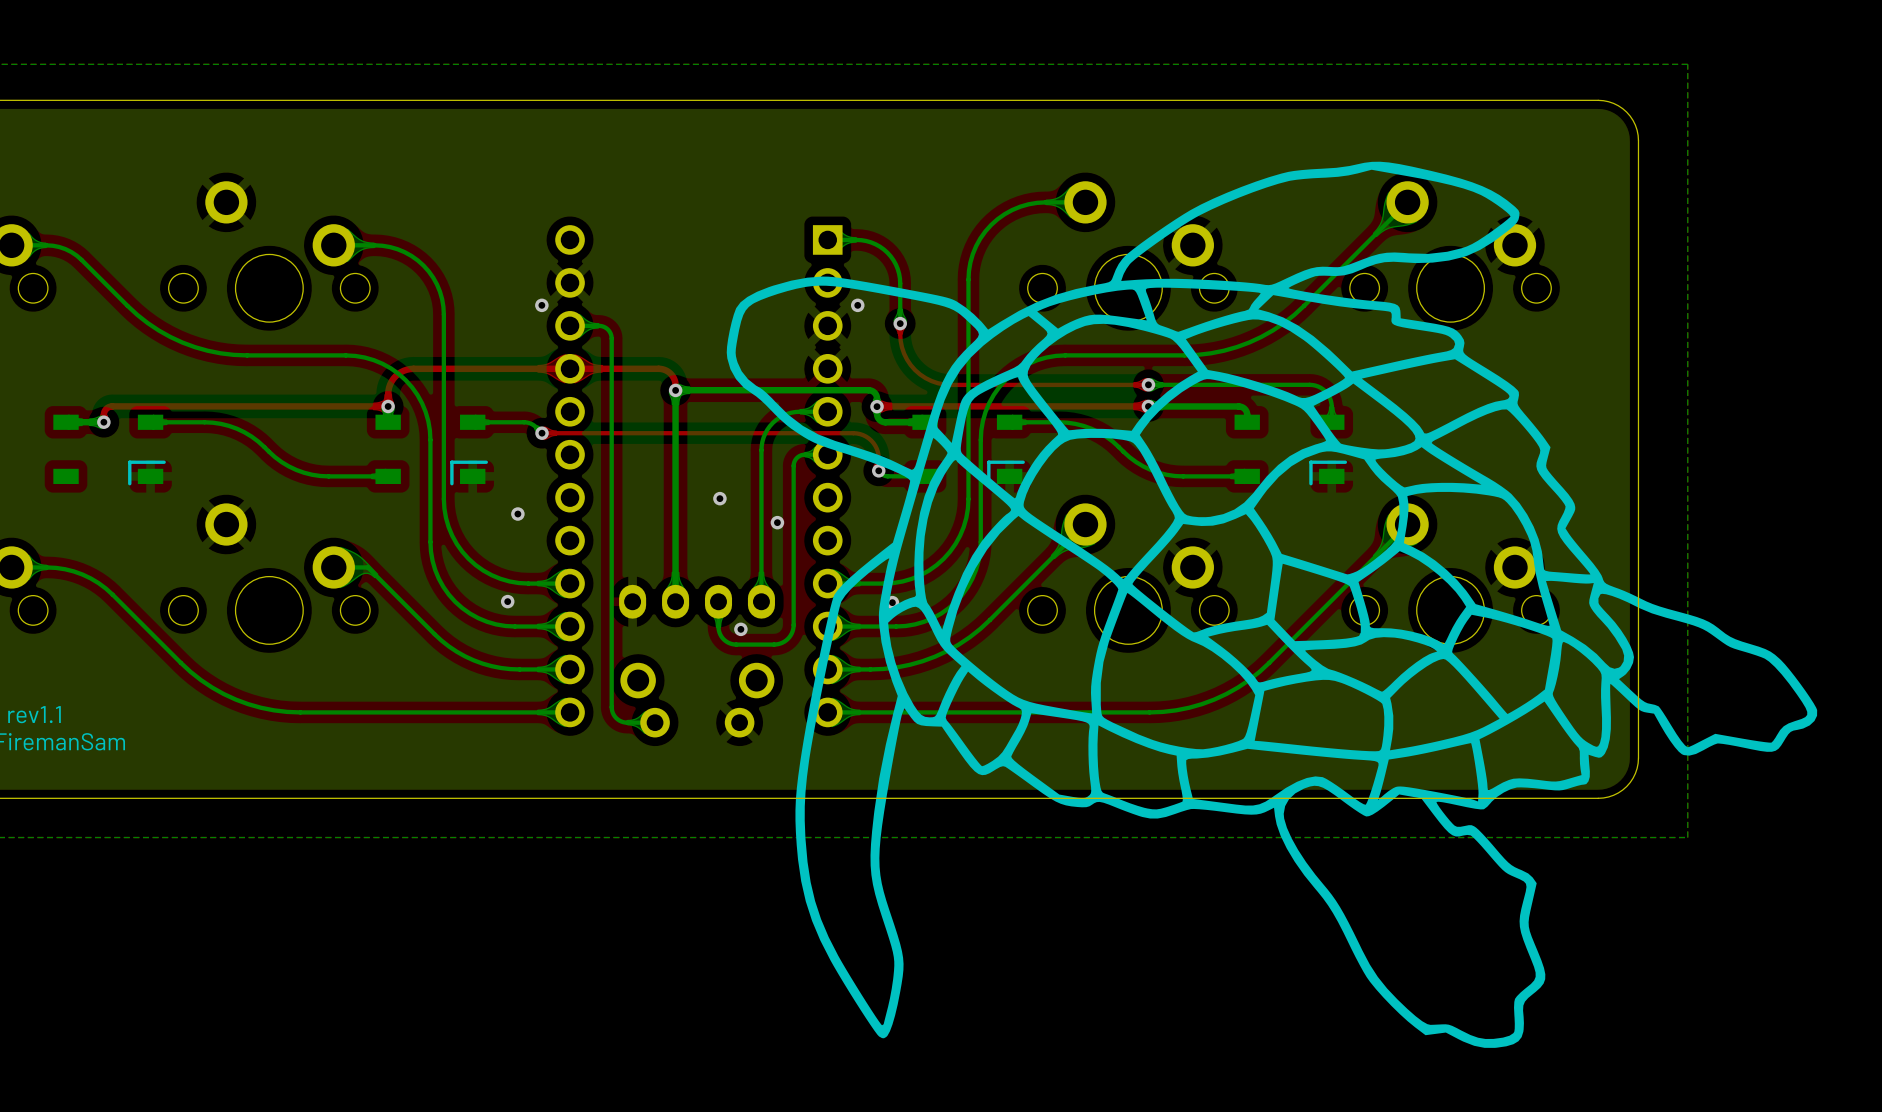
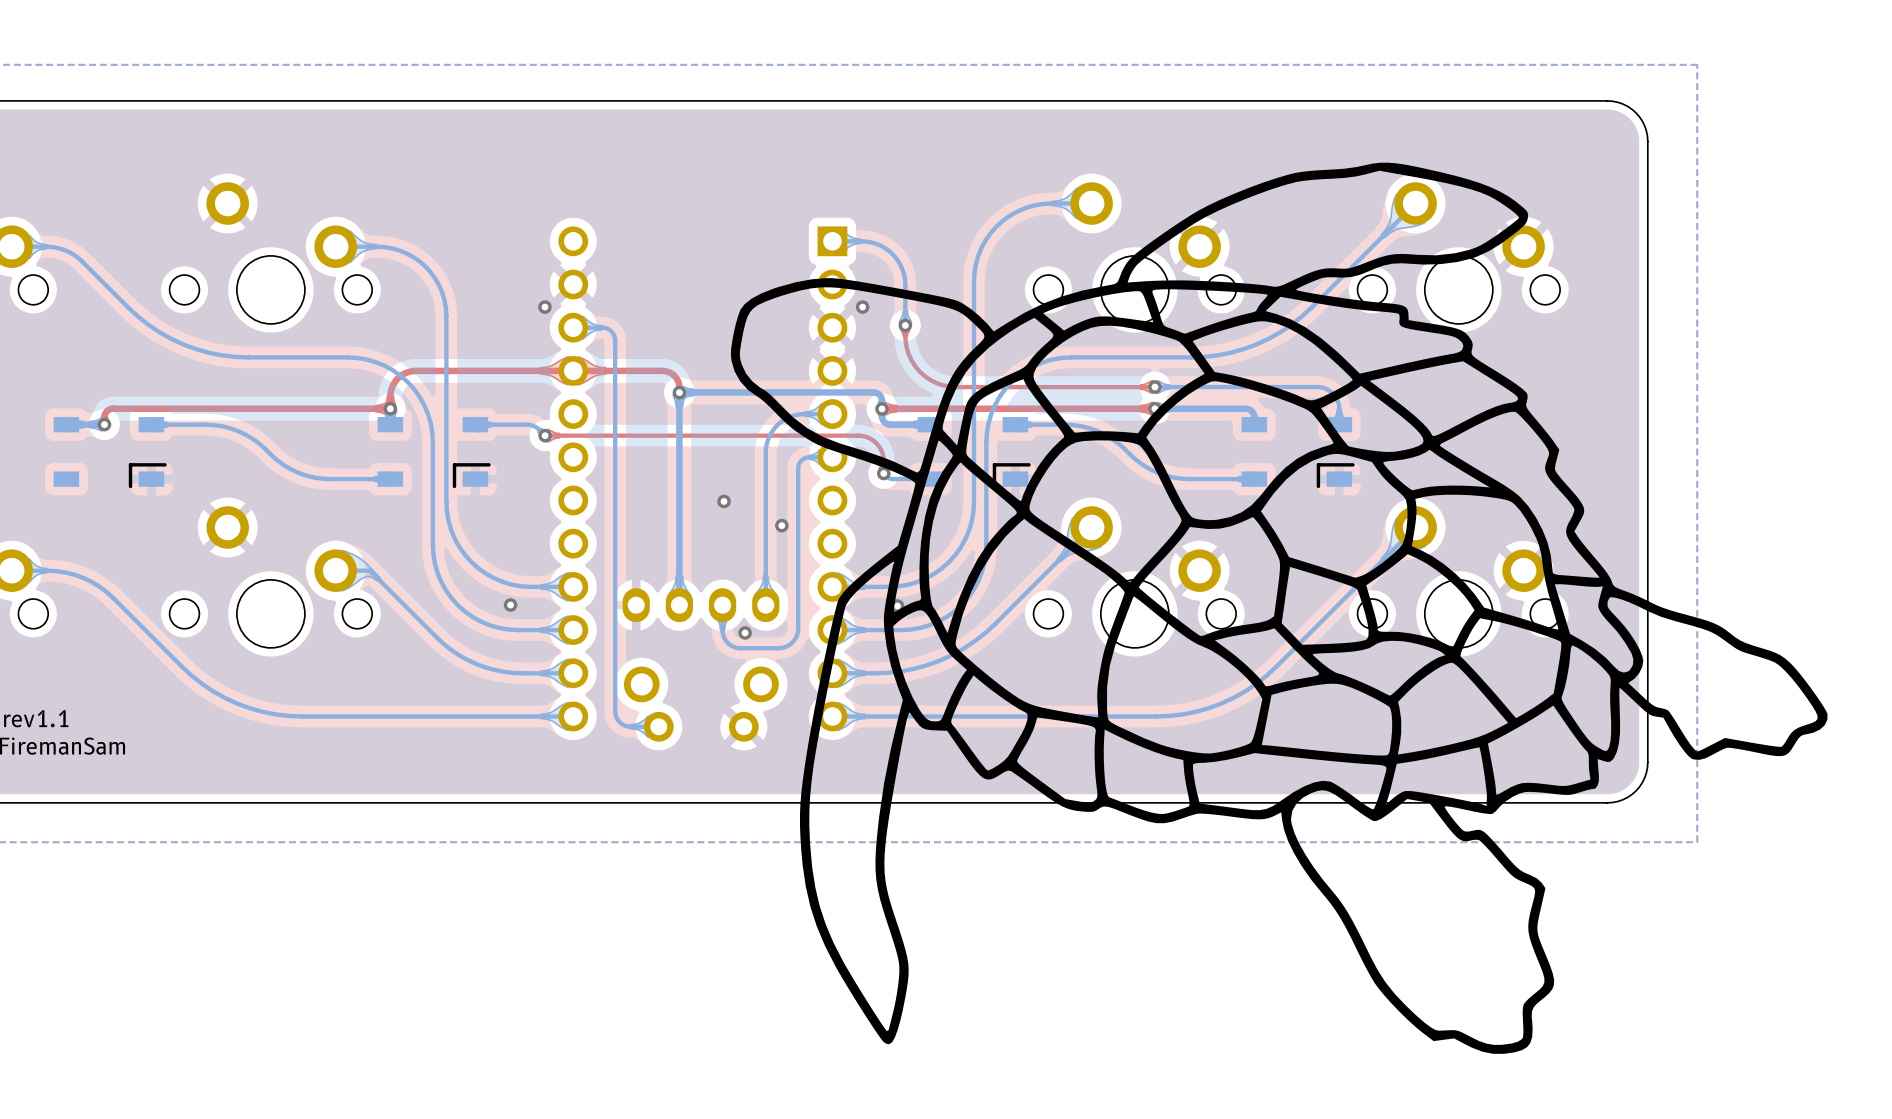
via: (517, 514) -> none

